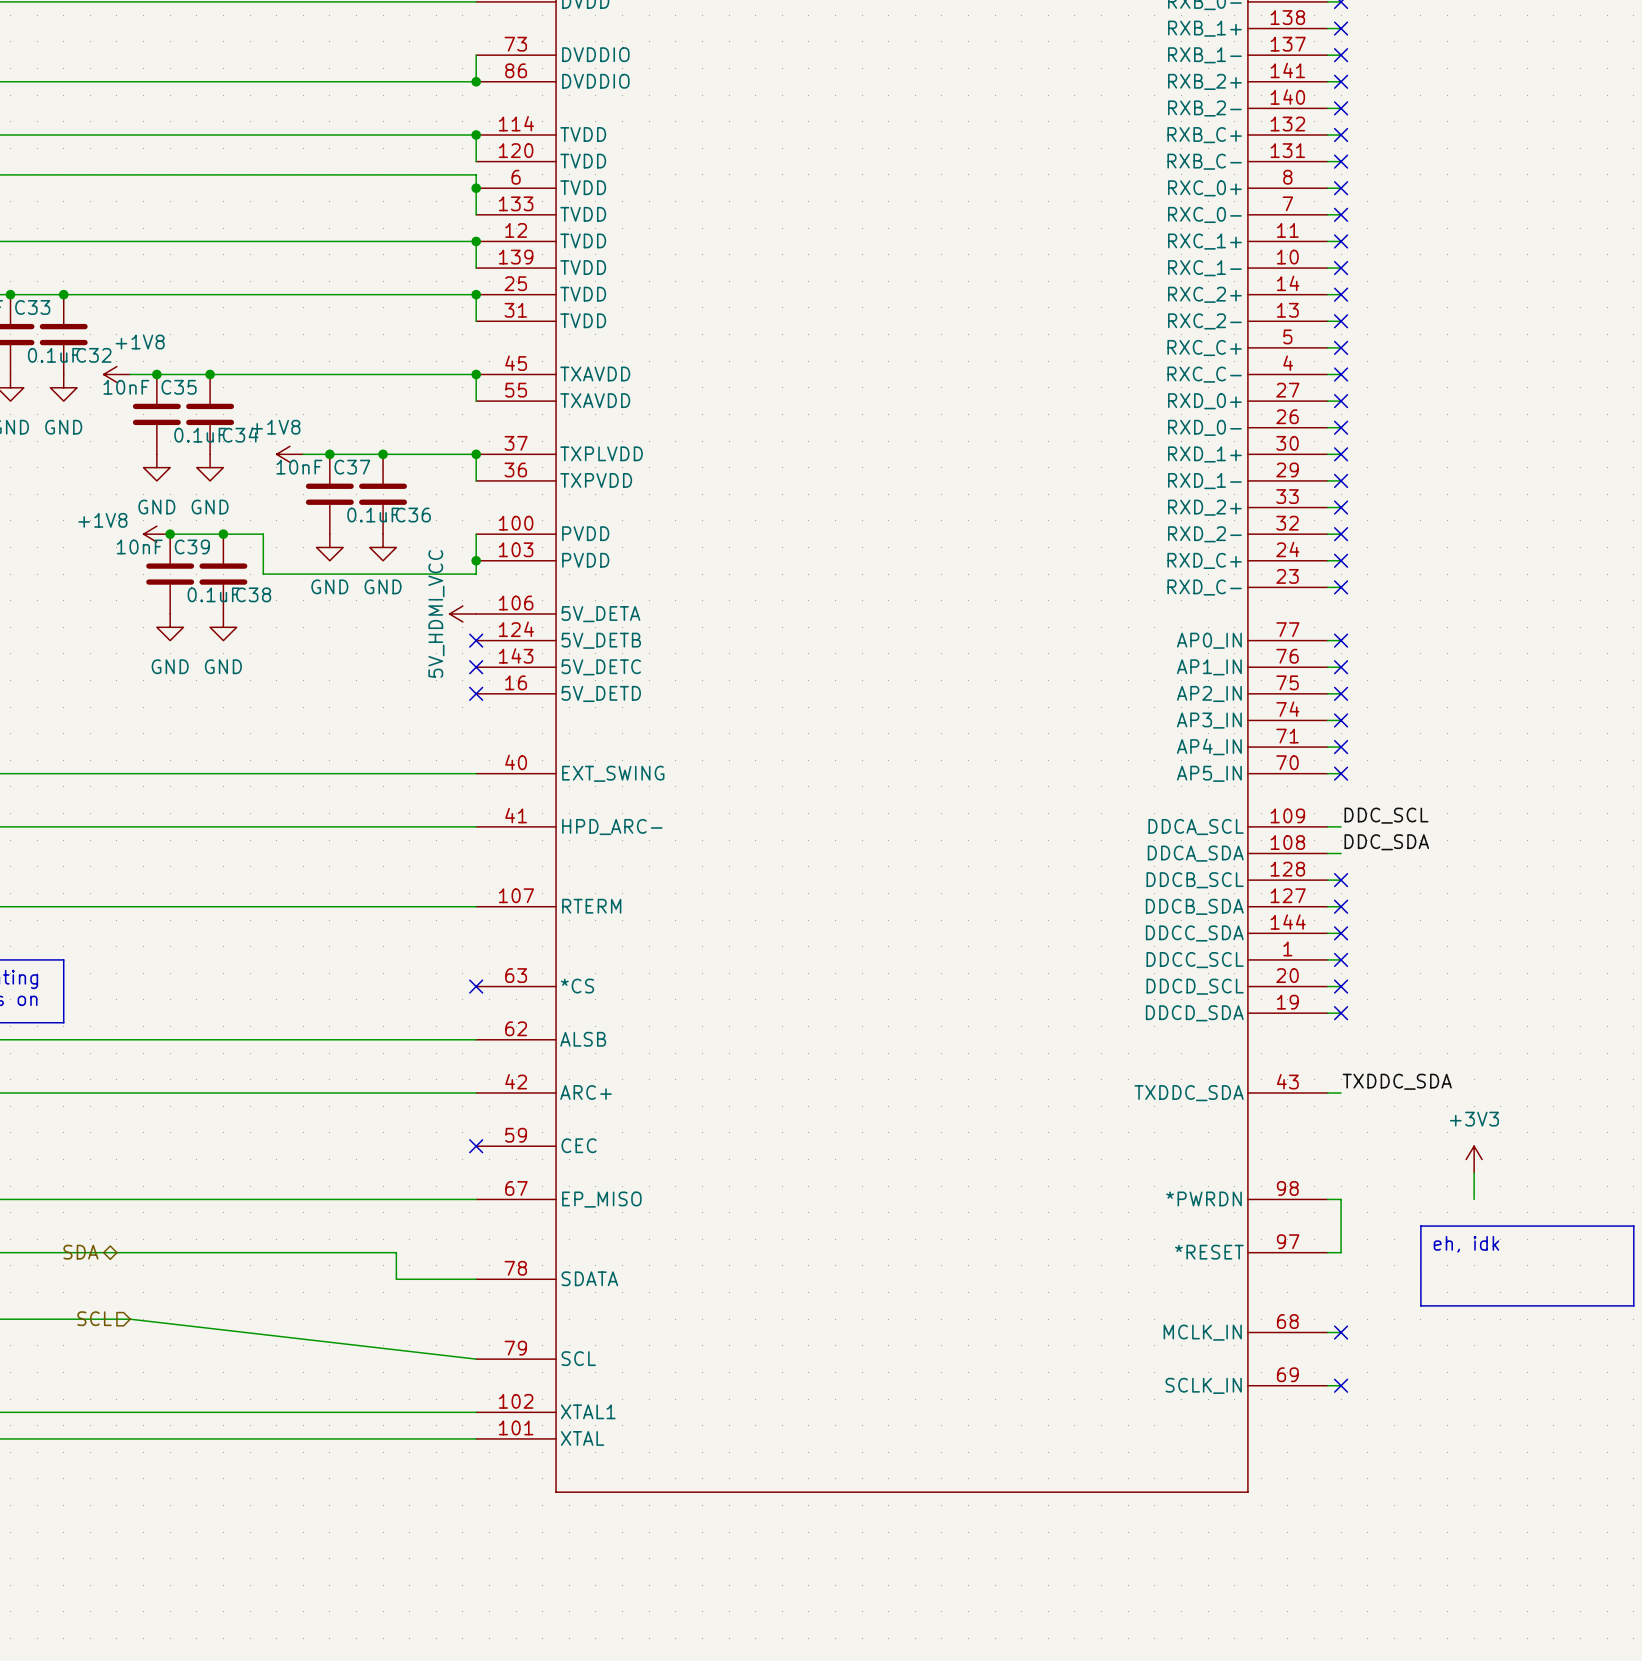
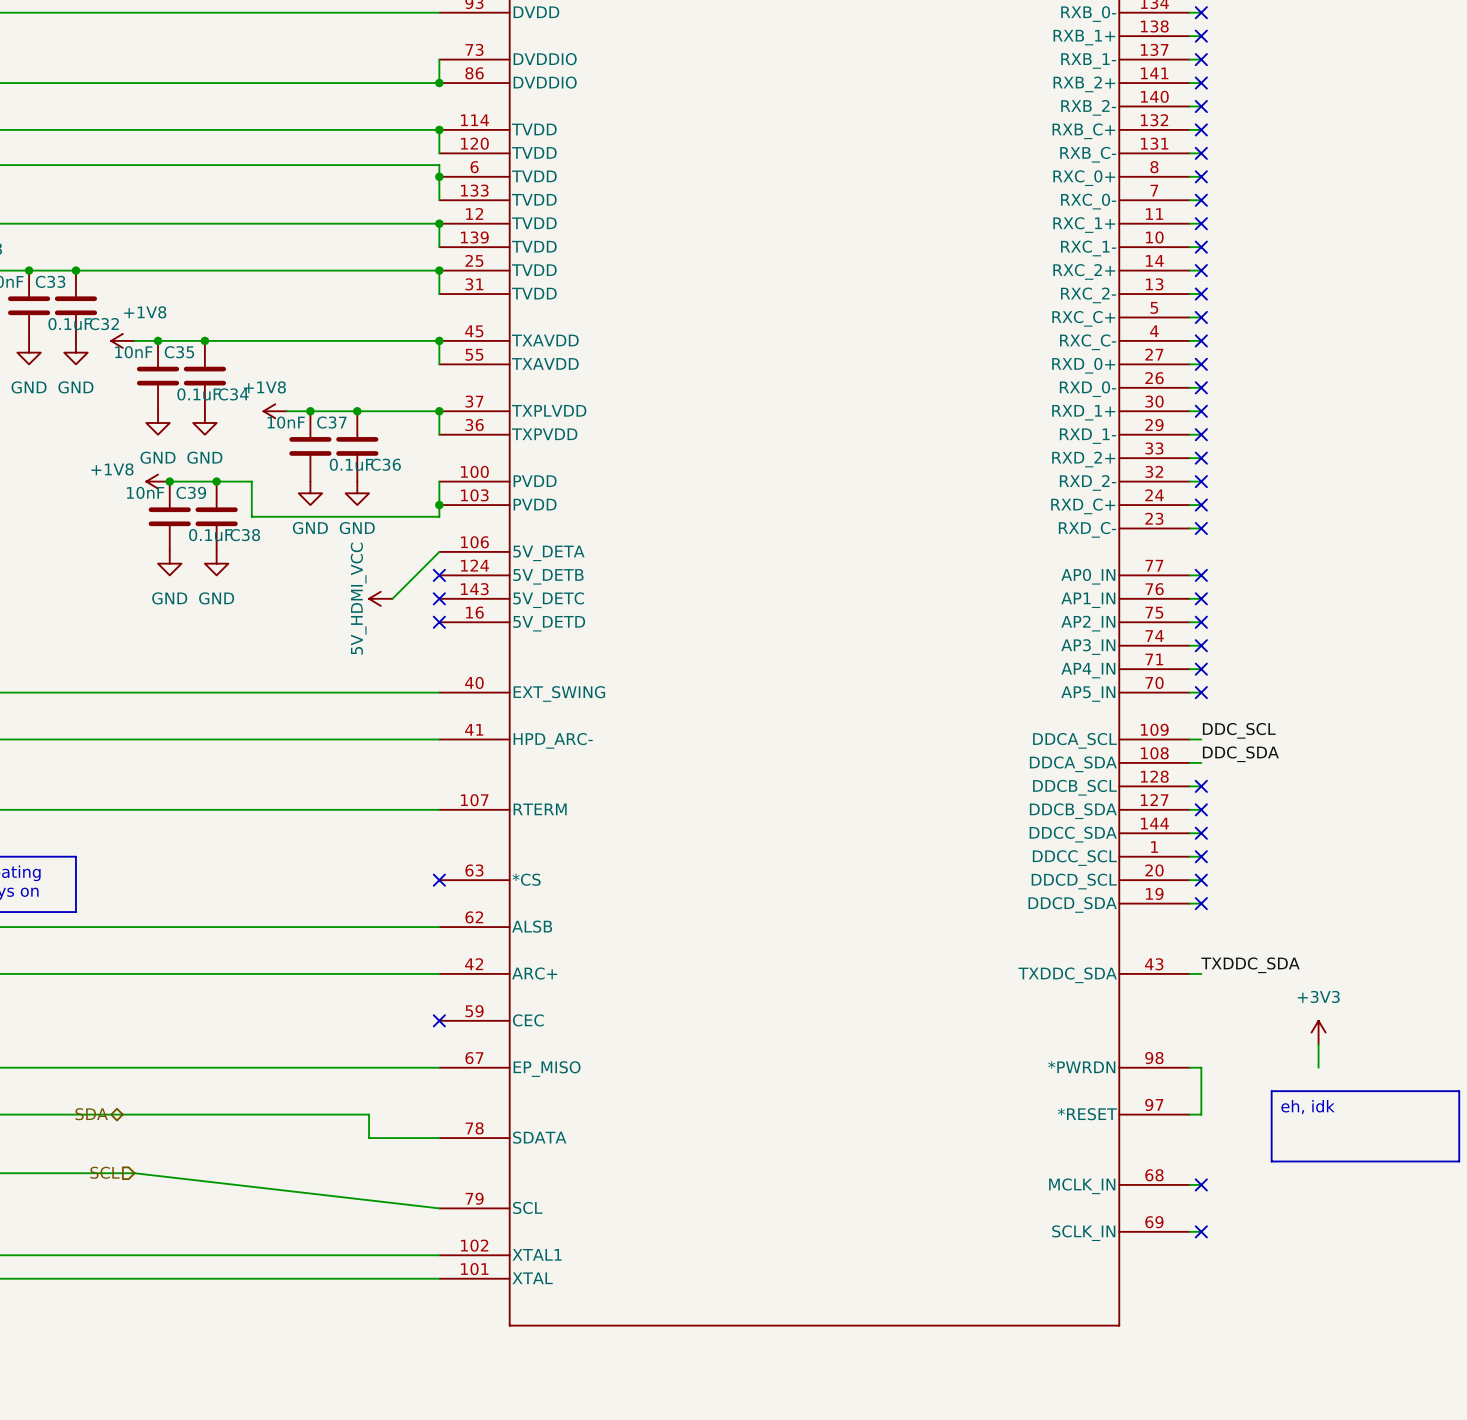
power symbol position: 5V_HDMI_VCC (462, 613) -> 5V_HDMI_VCC (380, 598)
wire: none -> (439, 551) (392, 598)

